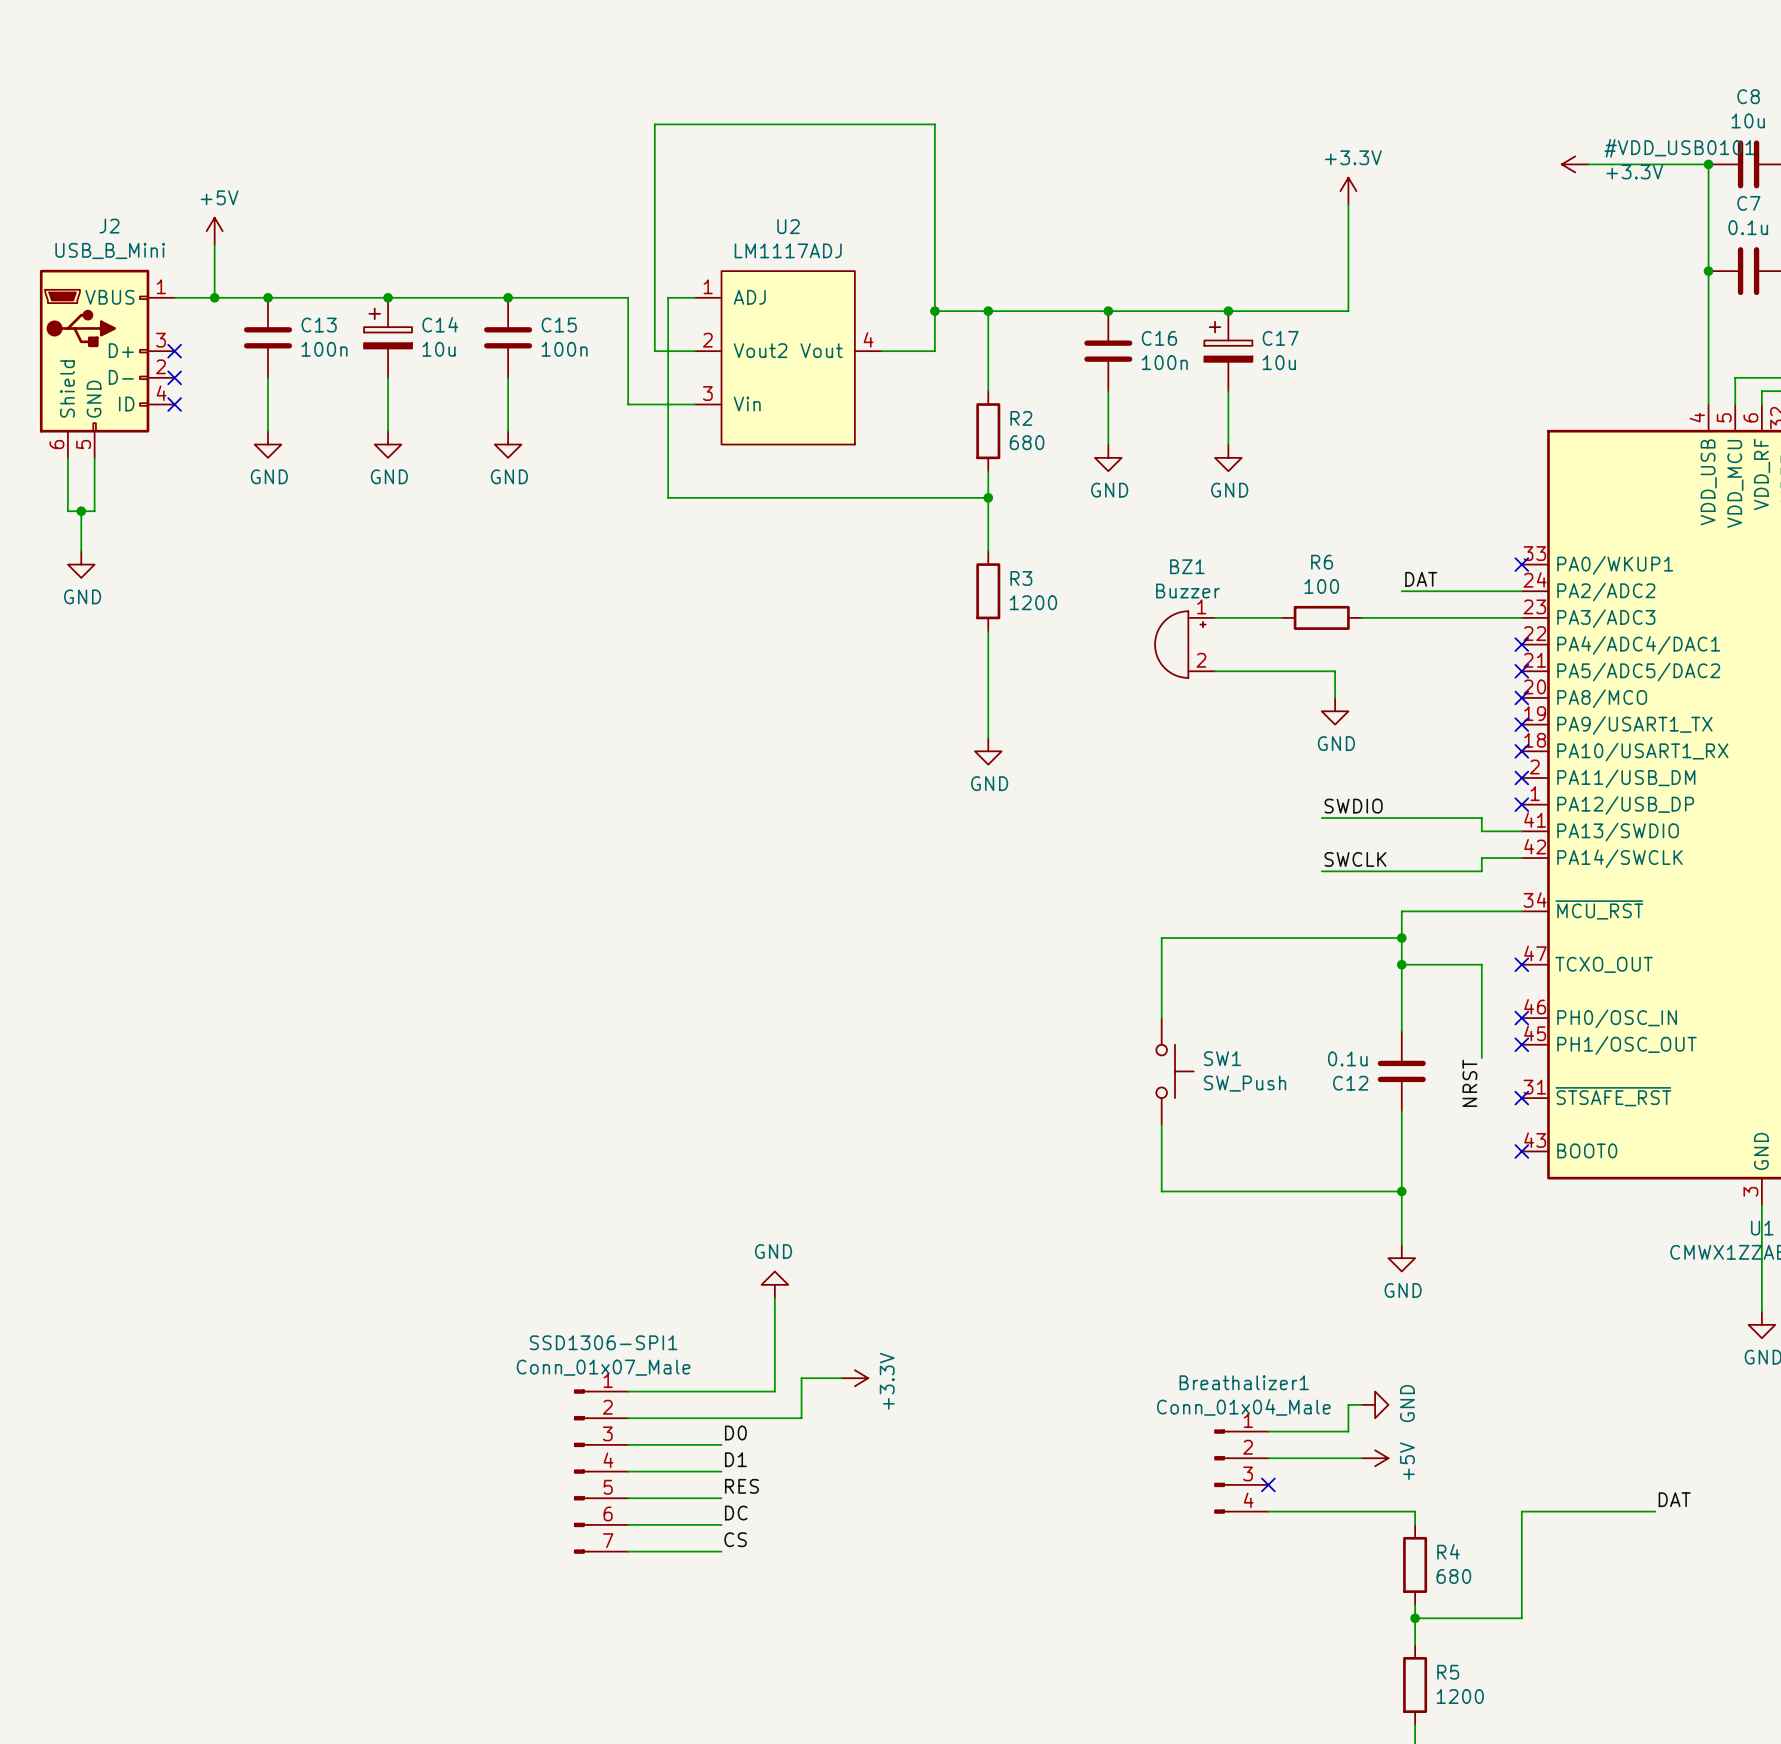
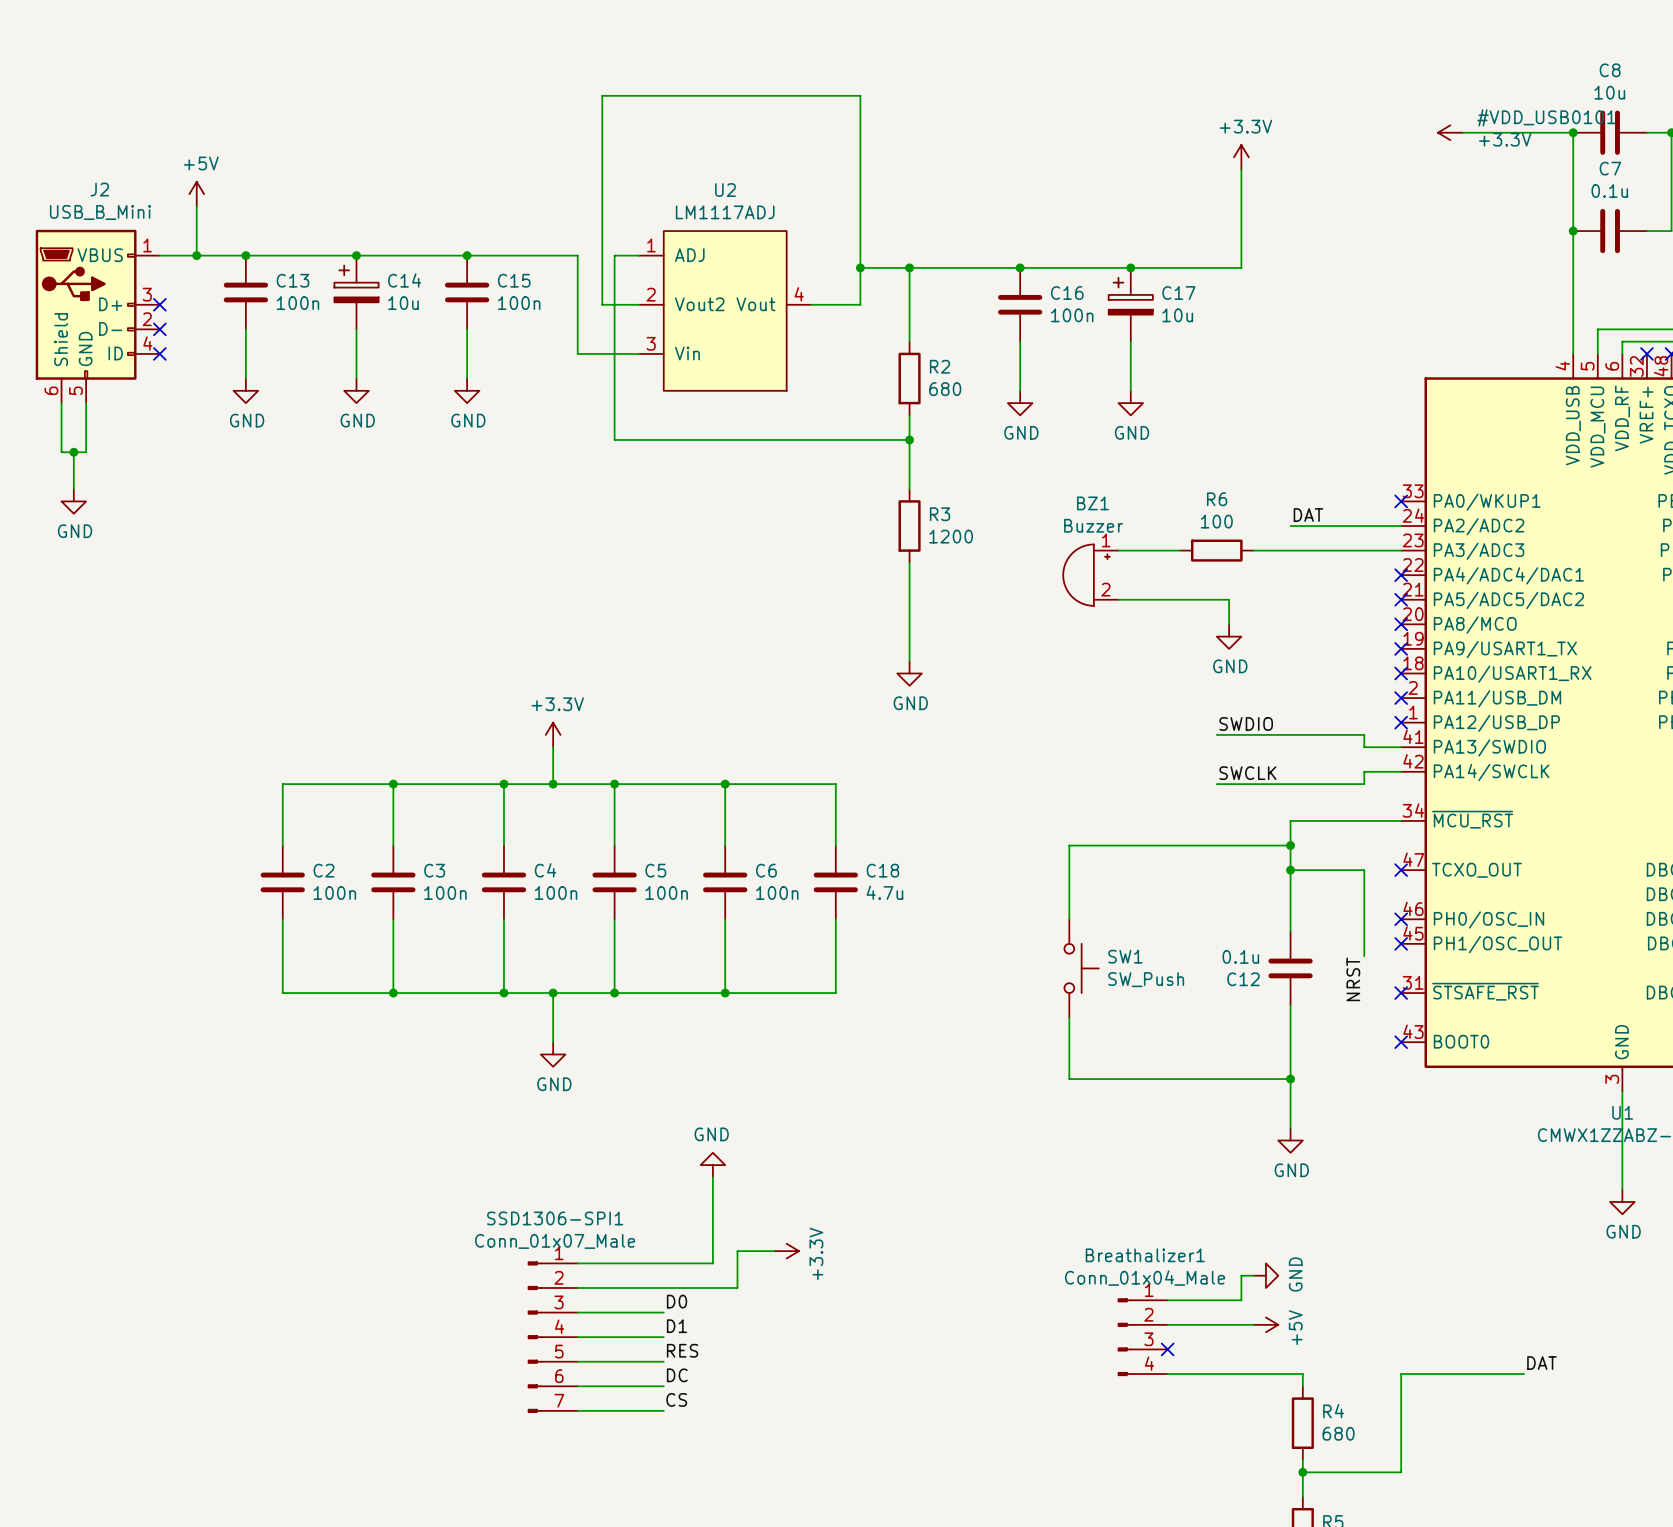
power symbol: none -> +3.3V (553, 734)
wire: none -> (553, 747) (553, 784)
wire: none -> (393, 784) (393, 845)
junction: none -> (393, 784)
wire: none -> (503, 784) (503, 845)
junction: none -> (503, 784)
junction: none -> (553, 784)
wire: none -> (614, 784) (614, 845)
junction: none -> (614, 784)
wire: none -> (725, 784) (725, 845)
junction: none -> (725, 784)
wire: none -> (282, 845) (282, 784) (835, 784) (835, 845)
C2: none -> 100n (282, 882)
C3: none -> 100n (393, 882)
C4: none -> 100n (503, 882)
C5: none -> 100n (614, 882)
C6: none -> 100n (725, 882)
C18: none -> 4.7u (835, 882)
wire: none -> (282, 919) (282, 993) (835, 993) (835, 919)
wire: none -> (393, 919) (393, 993)
wire: none -> (503, 919) (503, 993)
wire: none -> (614, 919) (614, 993)
wire: none -> (725, 919) (725, 993)
junction: none -> (393, 993)
junction: none -> (503, 993)
wire: none -> (553, 993) (553, 1042)
junction: none -> (553, 993)
junction: none -> (614, 993)
junction: none -> (725, 993)
power symbol: none -> GND (553, 1054)

